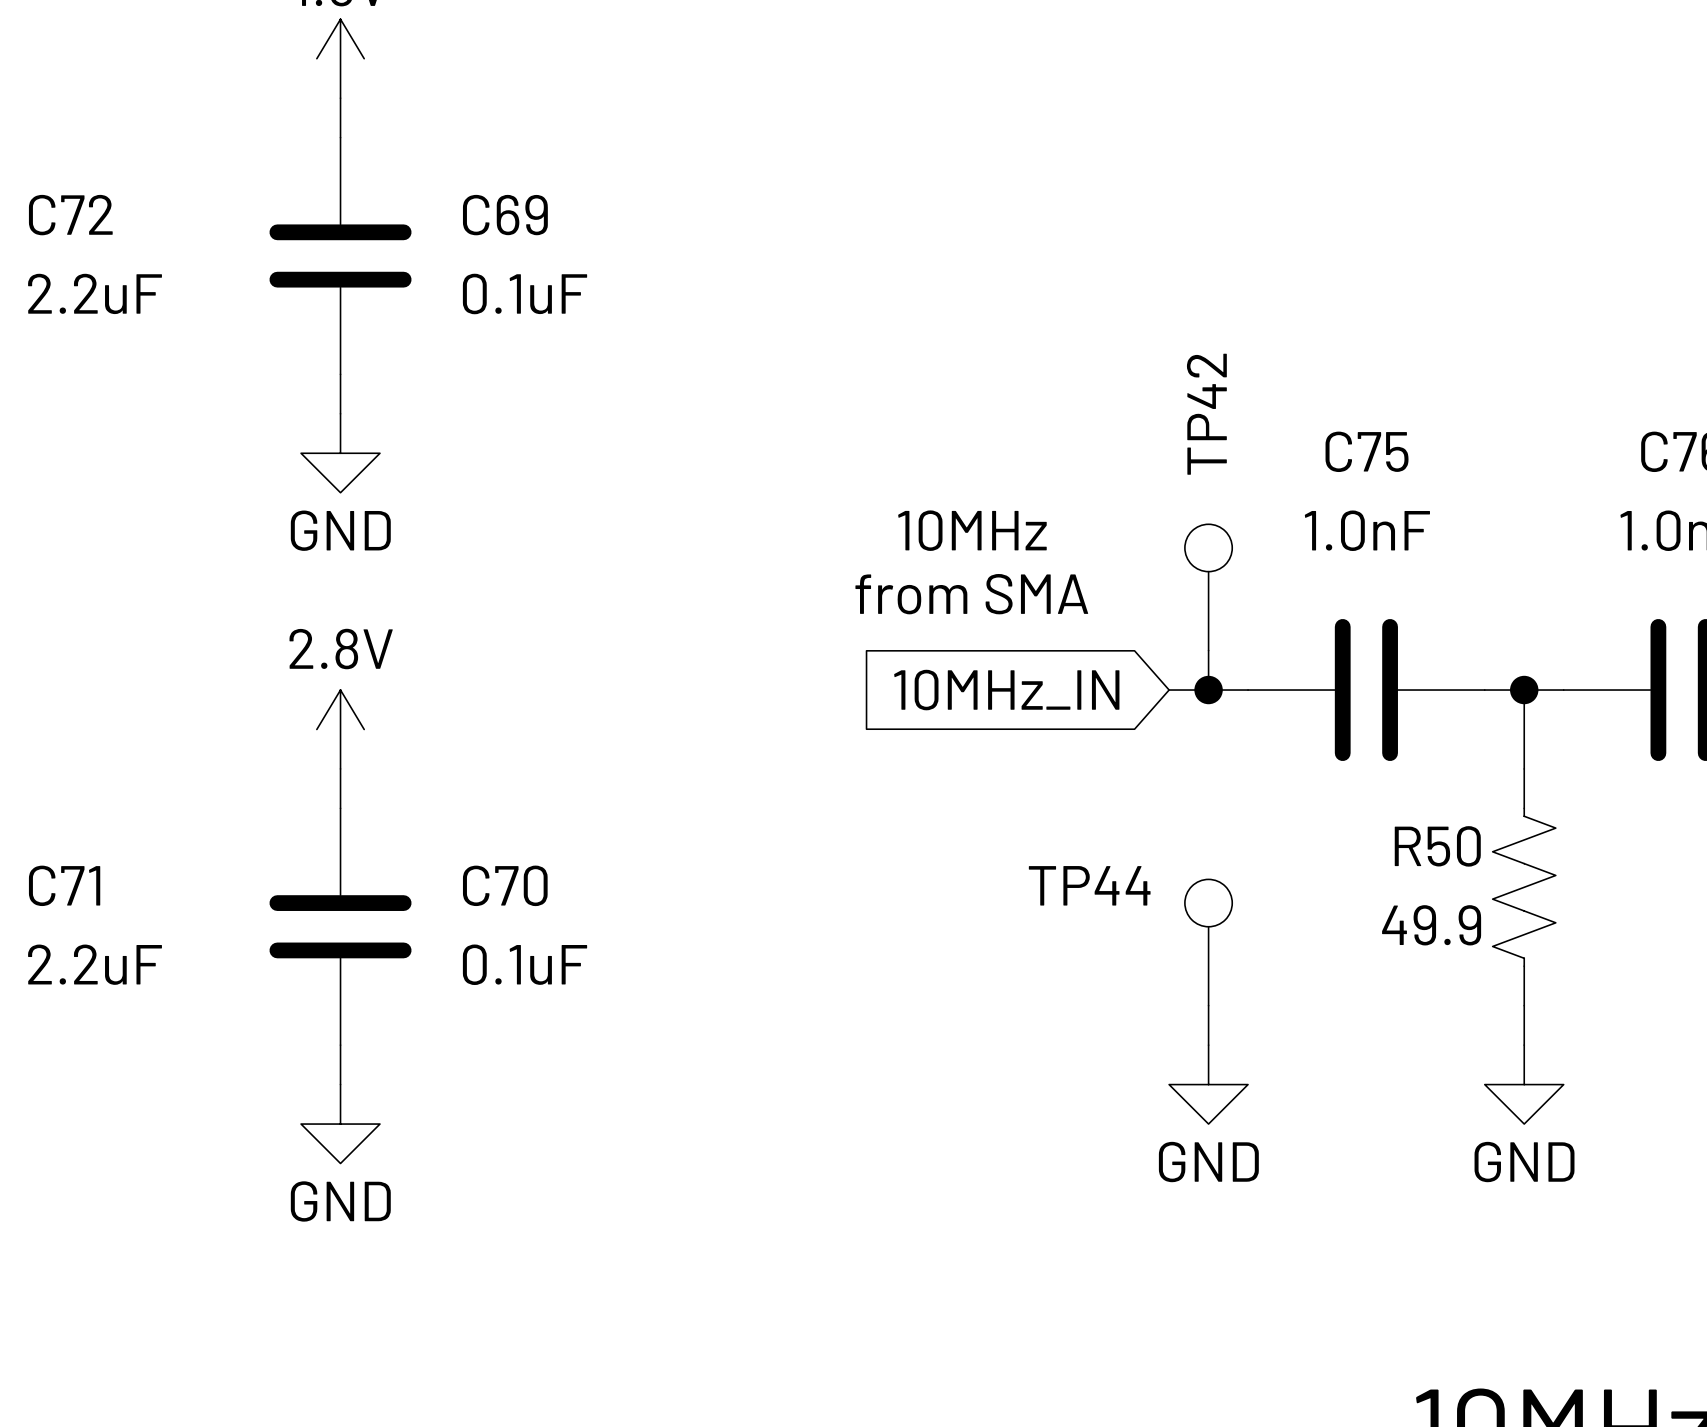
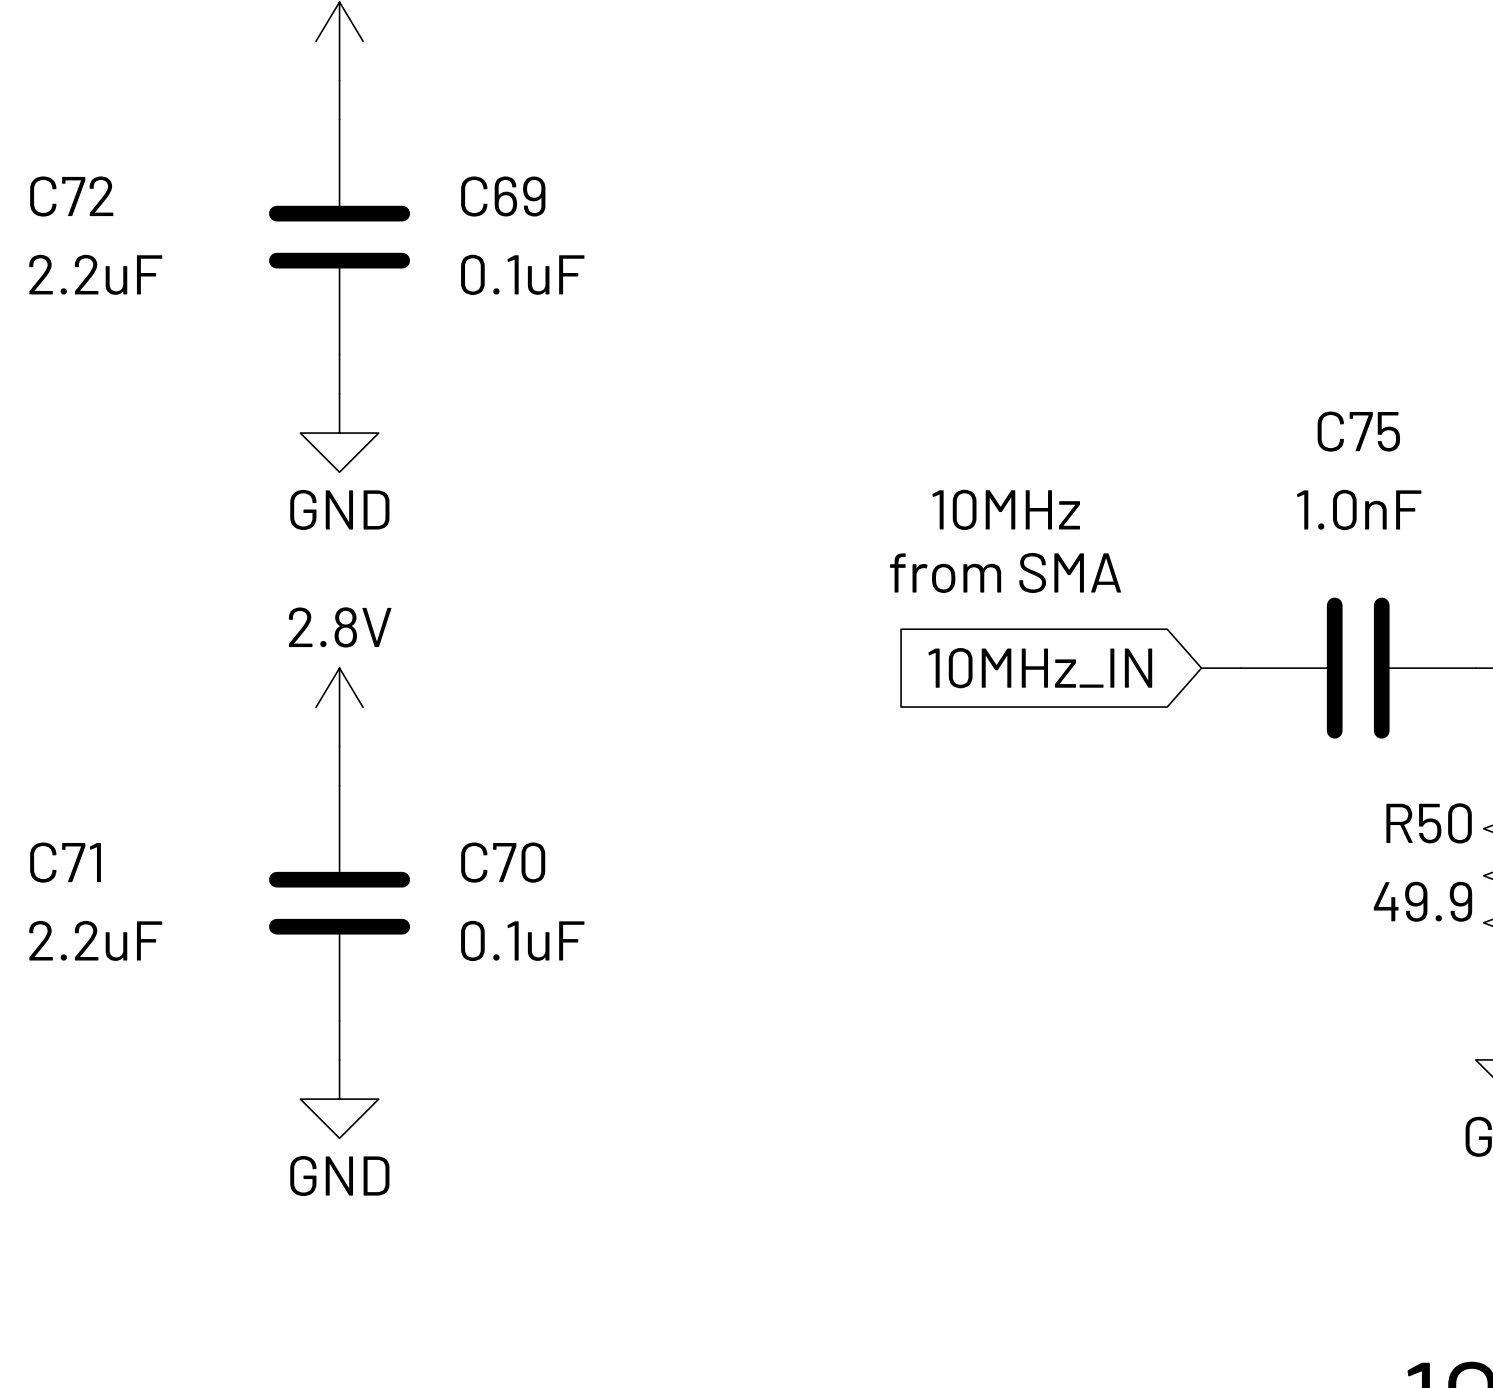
text position: 10MHz (972, 530) -> 10MHz (1006, 509)
TP42: (1208, 587) -> none
text position: from SMA (971, 594) -> from SMA (1005, 572)
wire: (1208, 650) (1208, 690) (1169, 690) -> none
global label position: 10MHz_IN (1006, 690) -> 10MHz_IN (1040, 668)
junction: (1208, 690) -> none
TP44: (1208, 942) -> none
wire: (1208, 1005) (1208, 1045) -> none
power symbol: GND (1208, 1084) -> none

